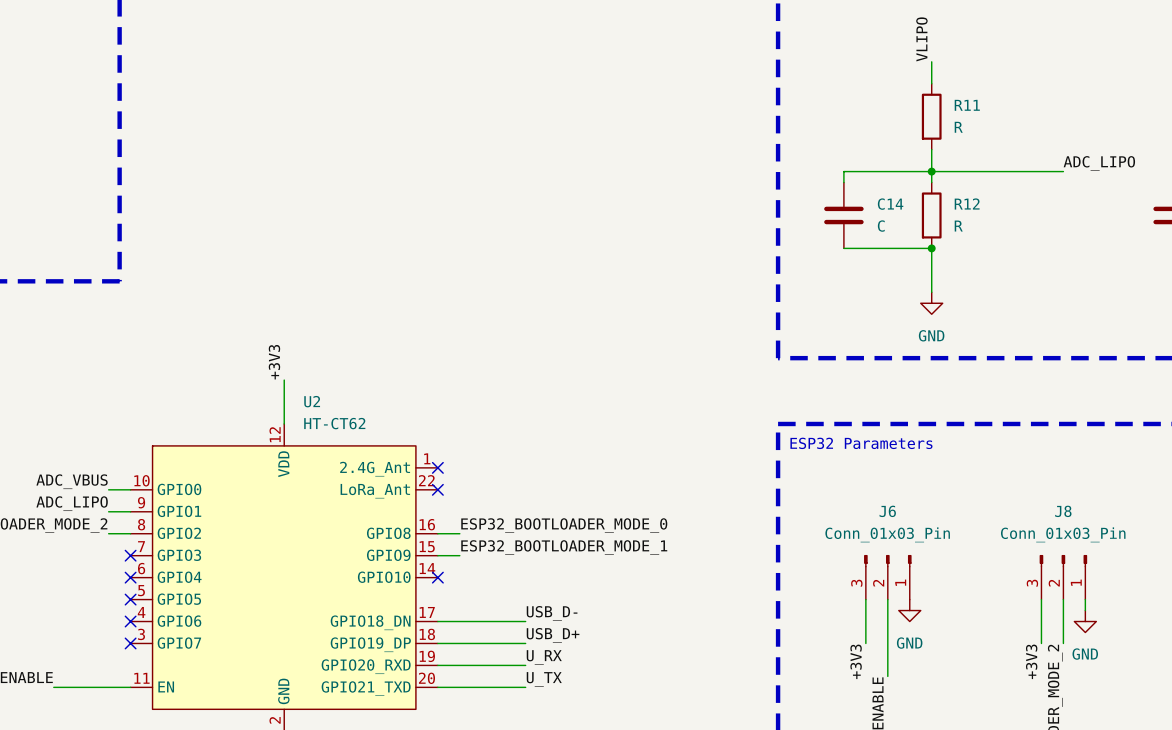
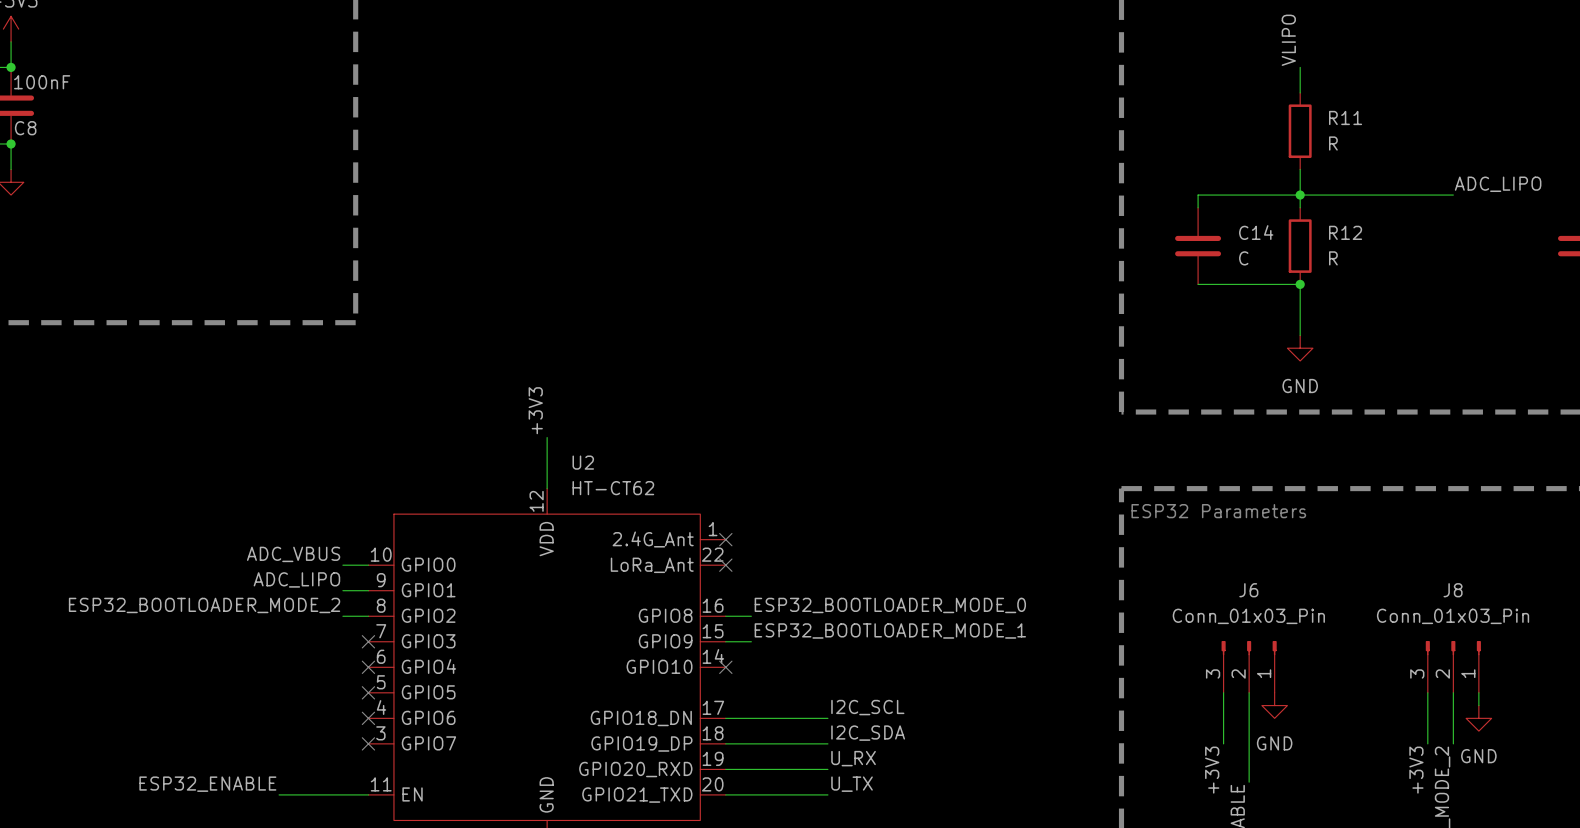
label: USB_D- (552, 613) -> I2C_SCL (867, 707)
label: USB_D+ (553, 635) -> I2C_SDA (868, 733)

